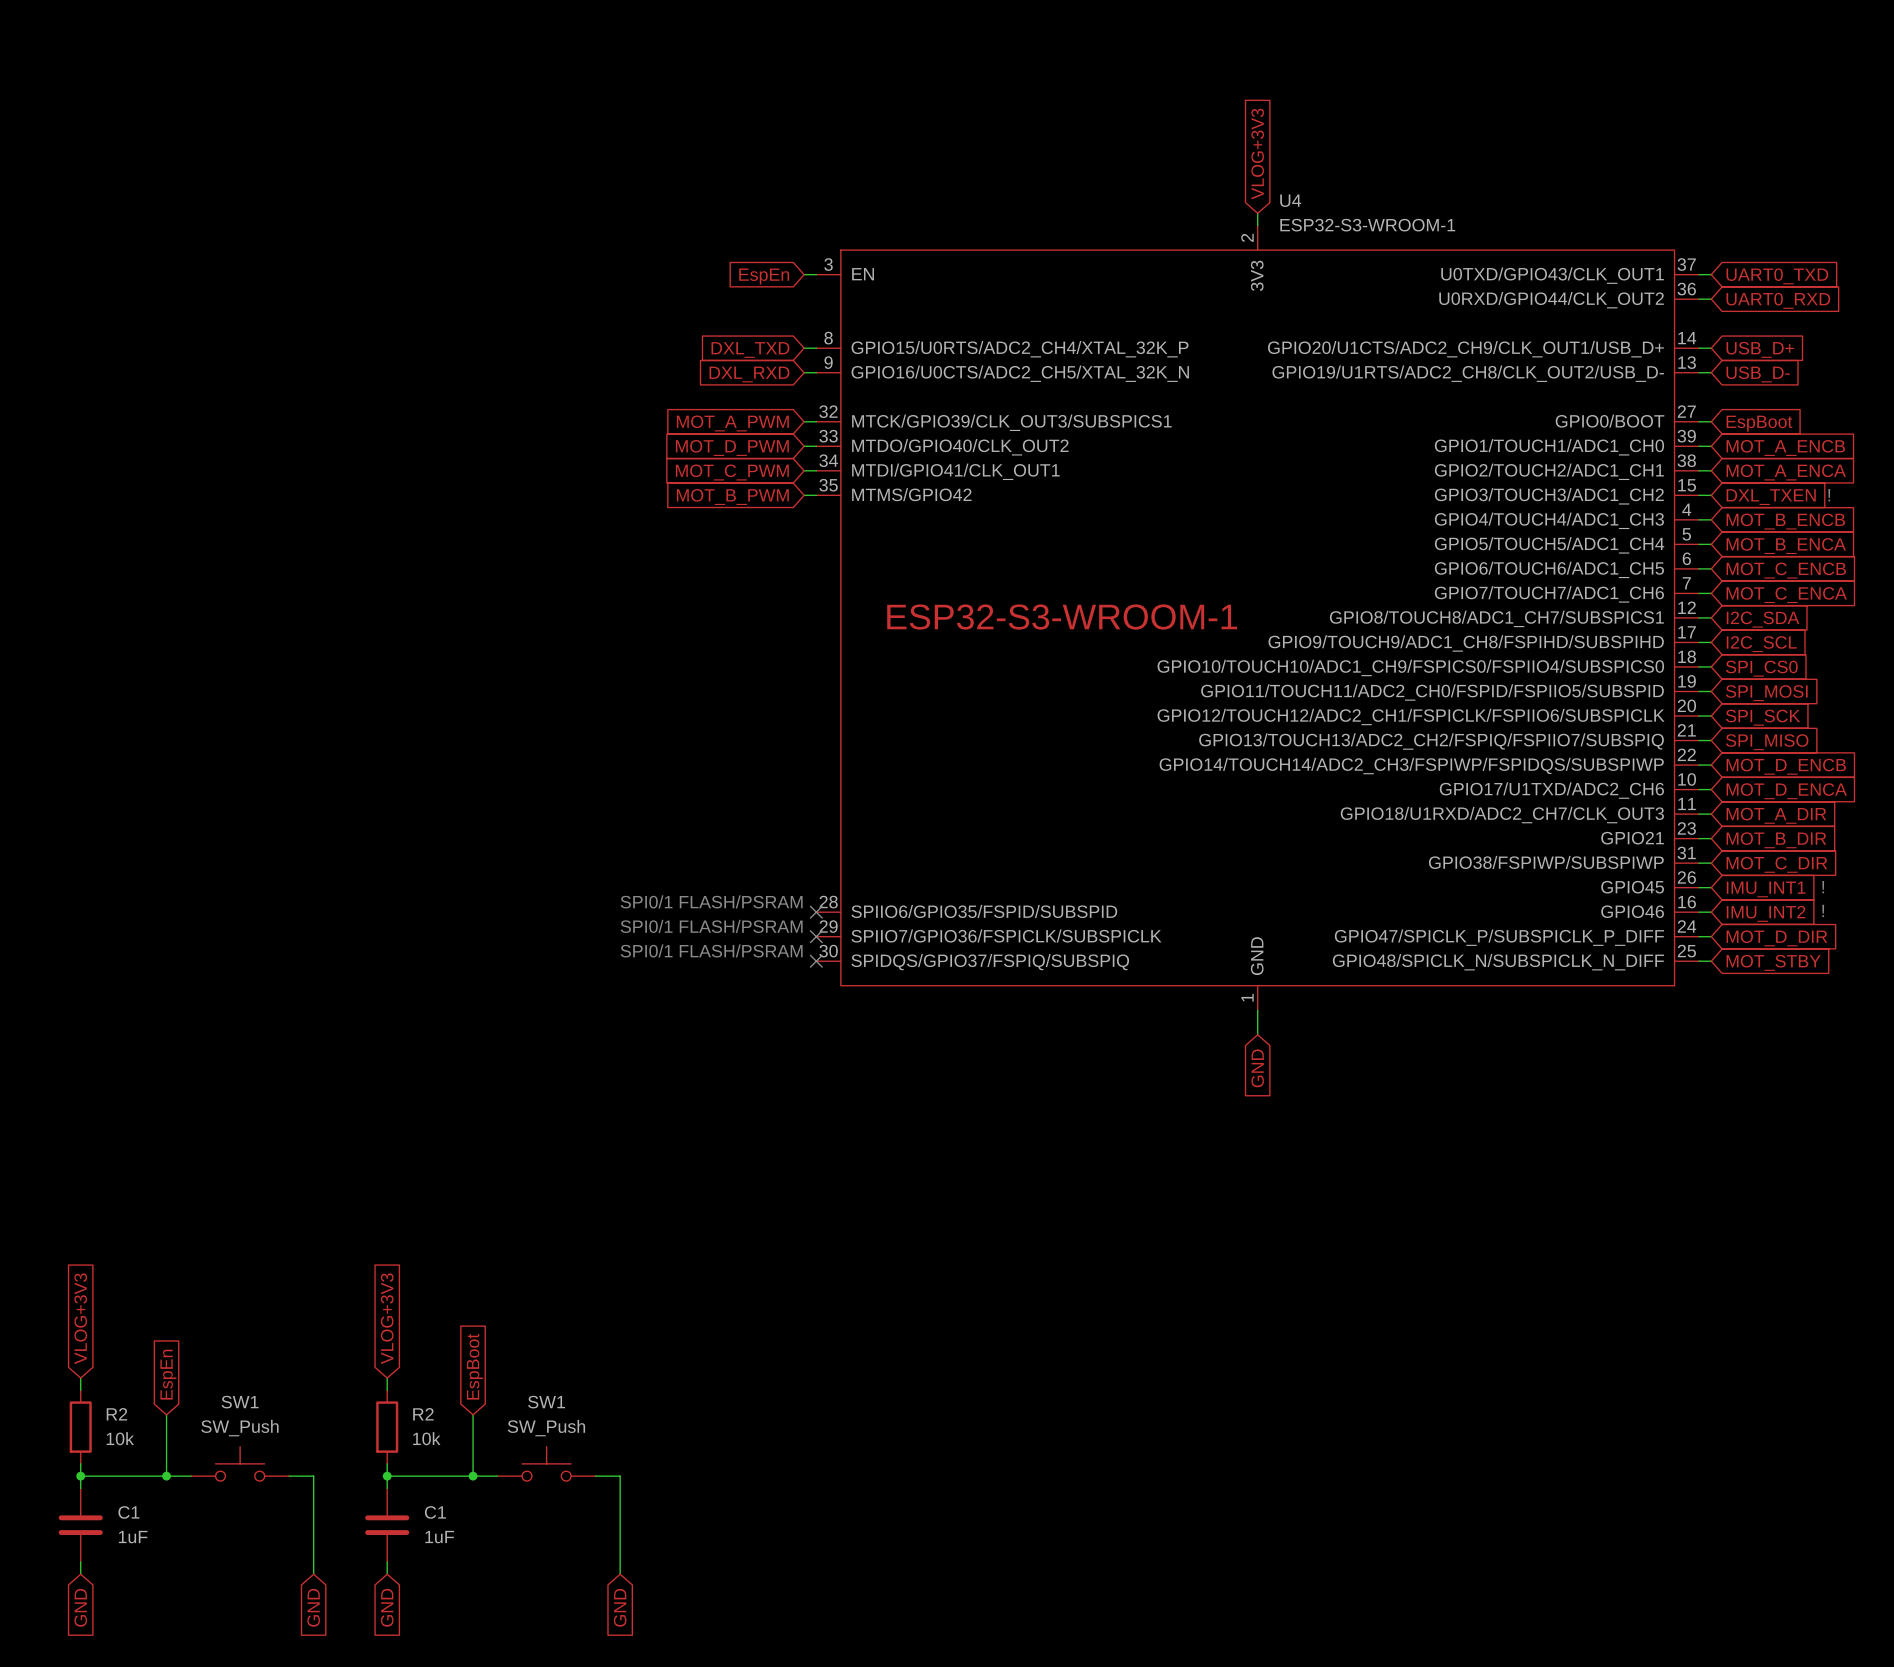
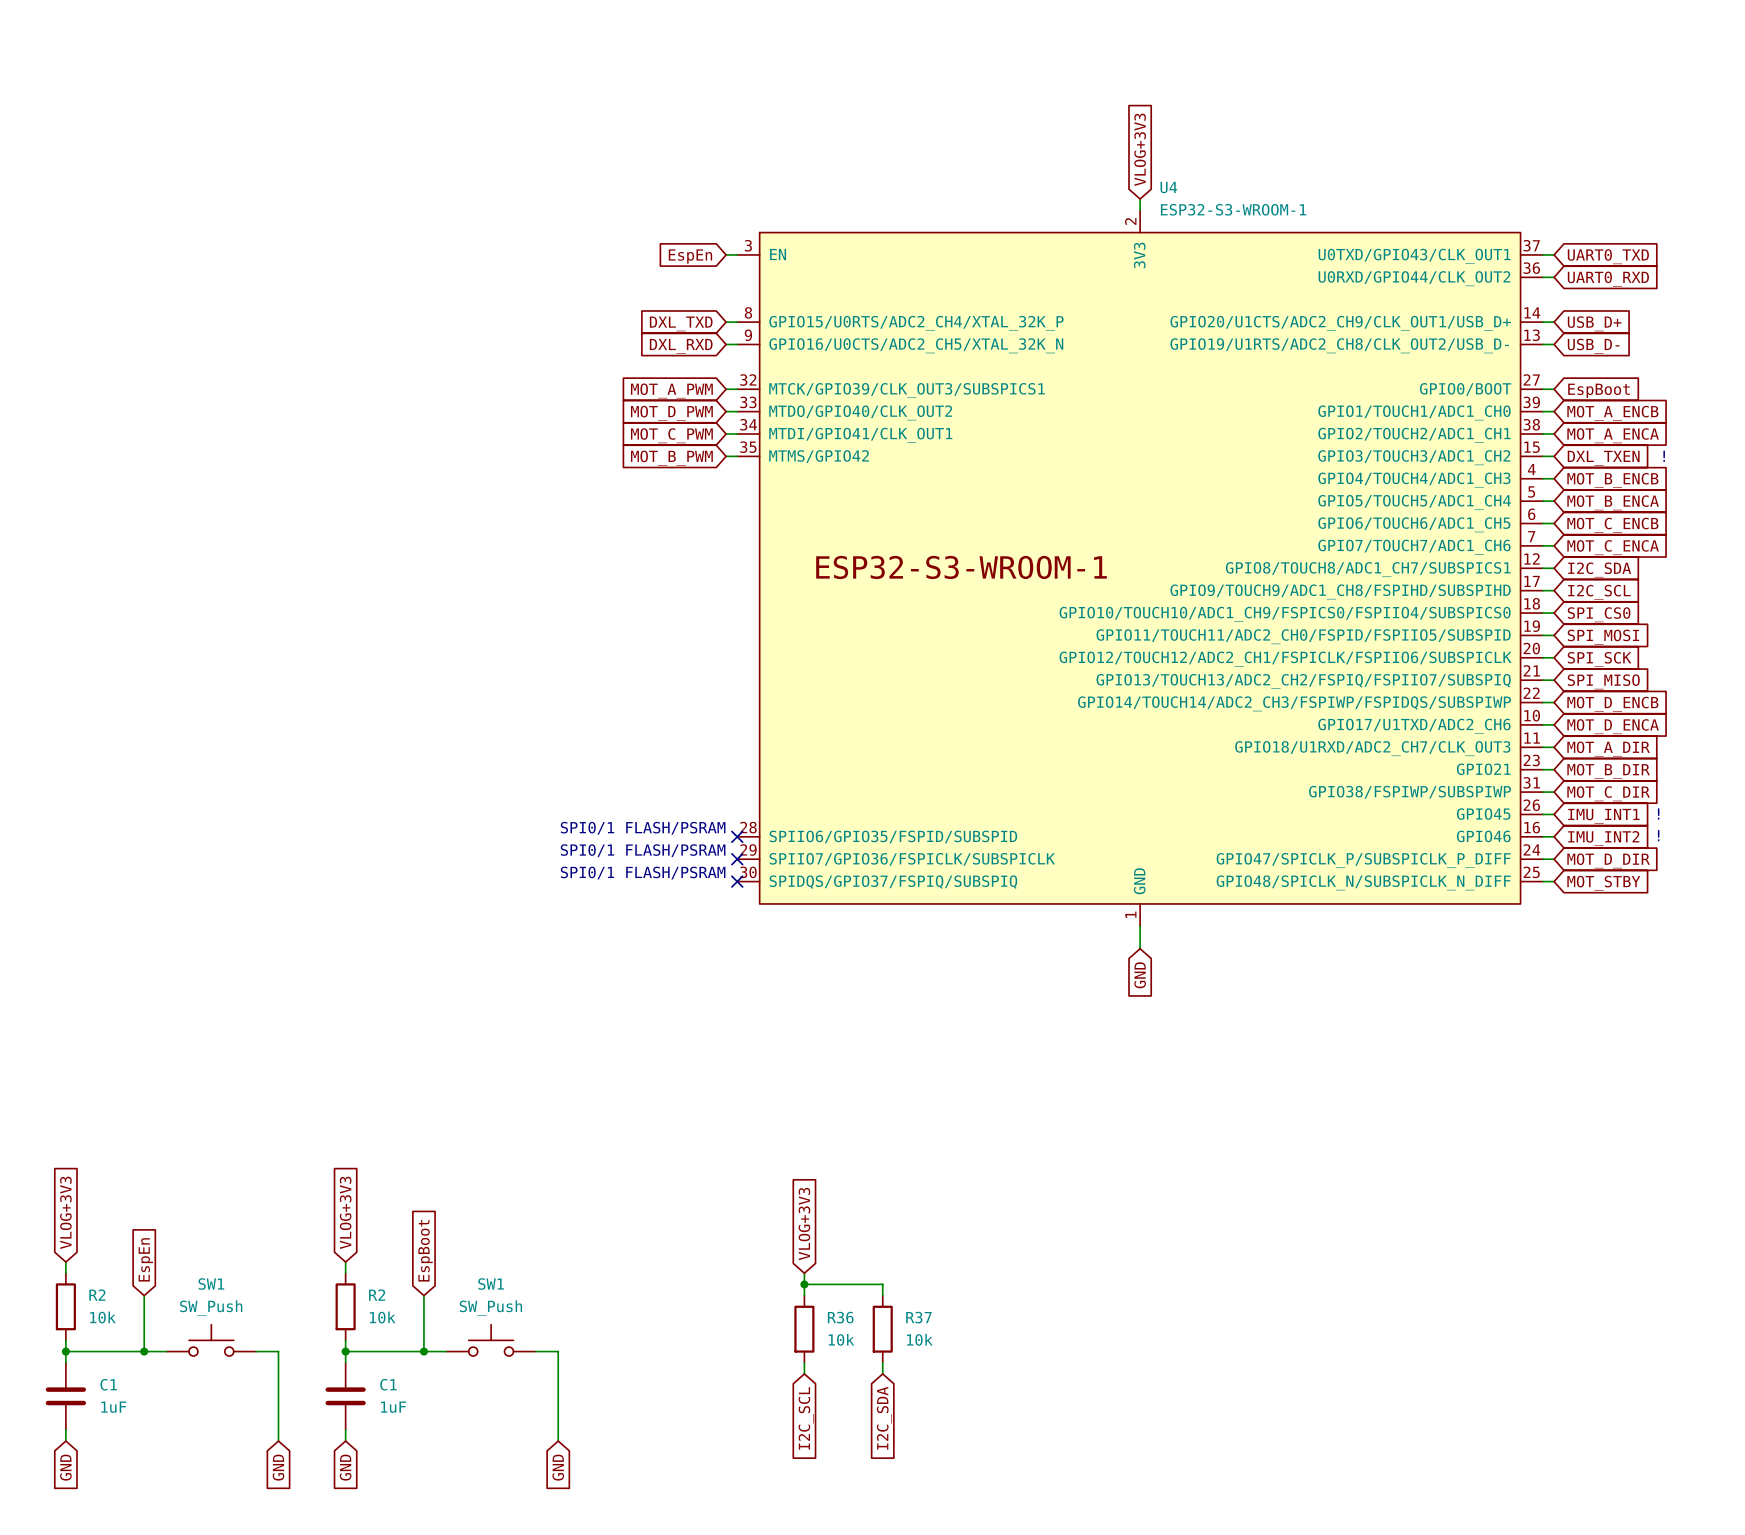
global label: none -> VLOG+3V3 (804, 1224)
wire: none -> (804, 1273) (804, 1295)
wire: none -> (804, 1284) (882, 1284) (882, 1295)
junction: none -> (804, 1284)
R36: none -> 10k (804, 1329)
R37: none -> 10k (882, 1329)
wire: none -> (804, 1362) (804, 1373)
wire: none -> (882, 1362) (882, 1373)
global label: none -> I2C_SCL (806, 1418)
global label: none -> I2C_SDA (884, 1418)

